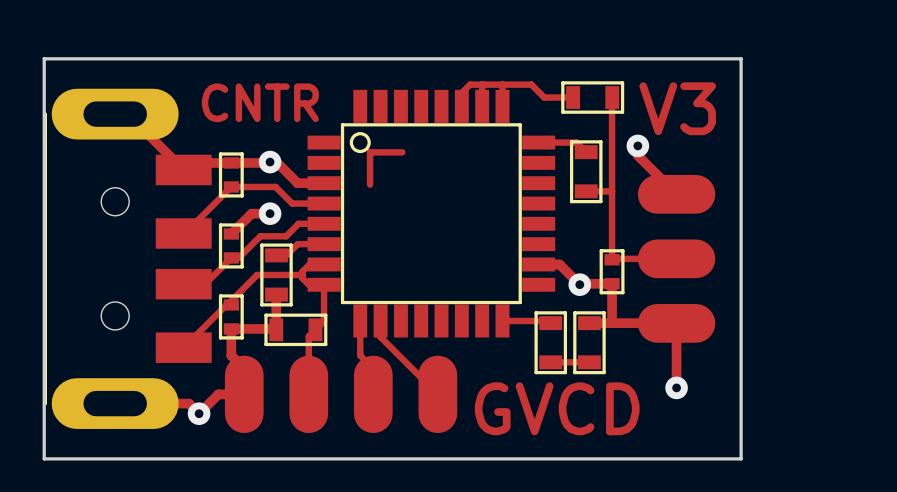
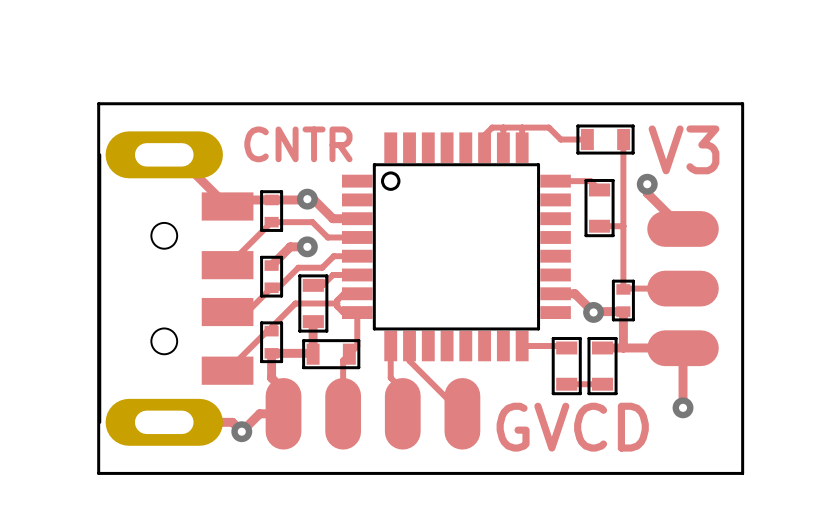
track: (402, 152) (370, 152) (370, 184) -> none

